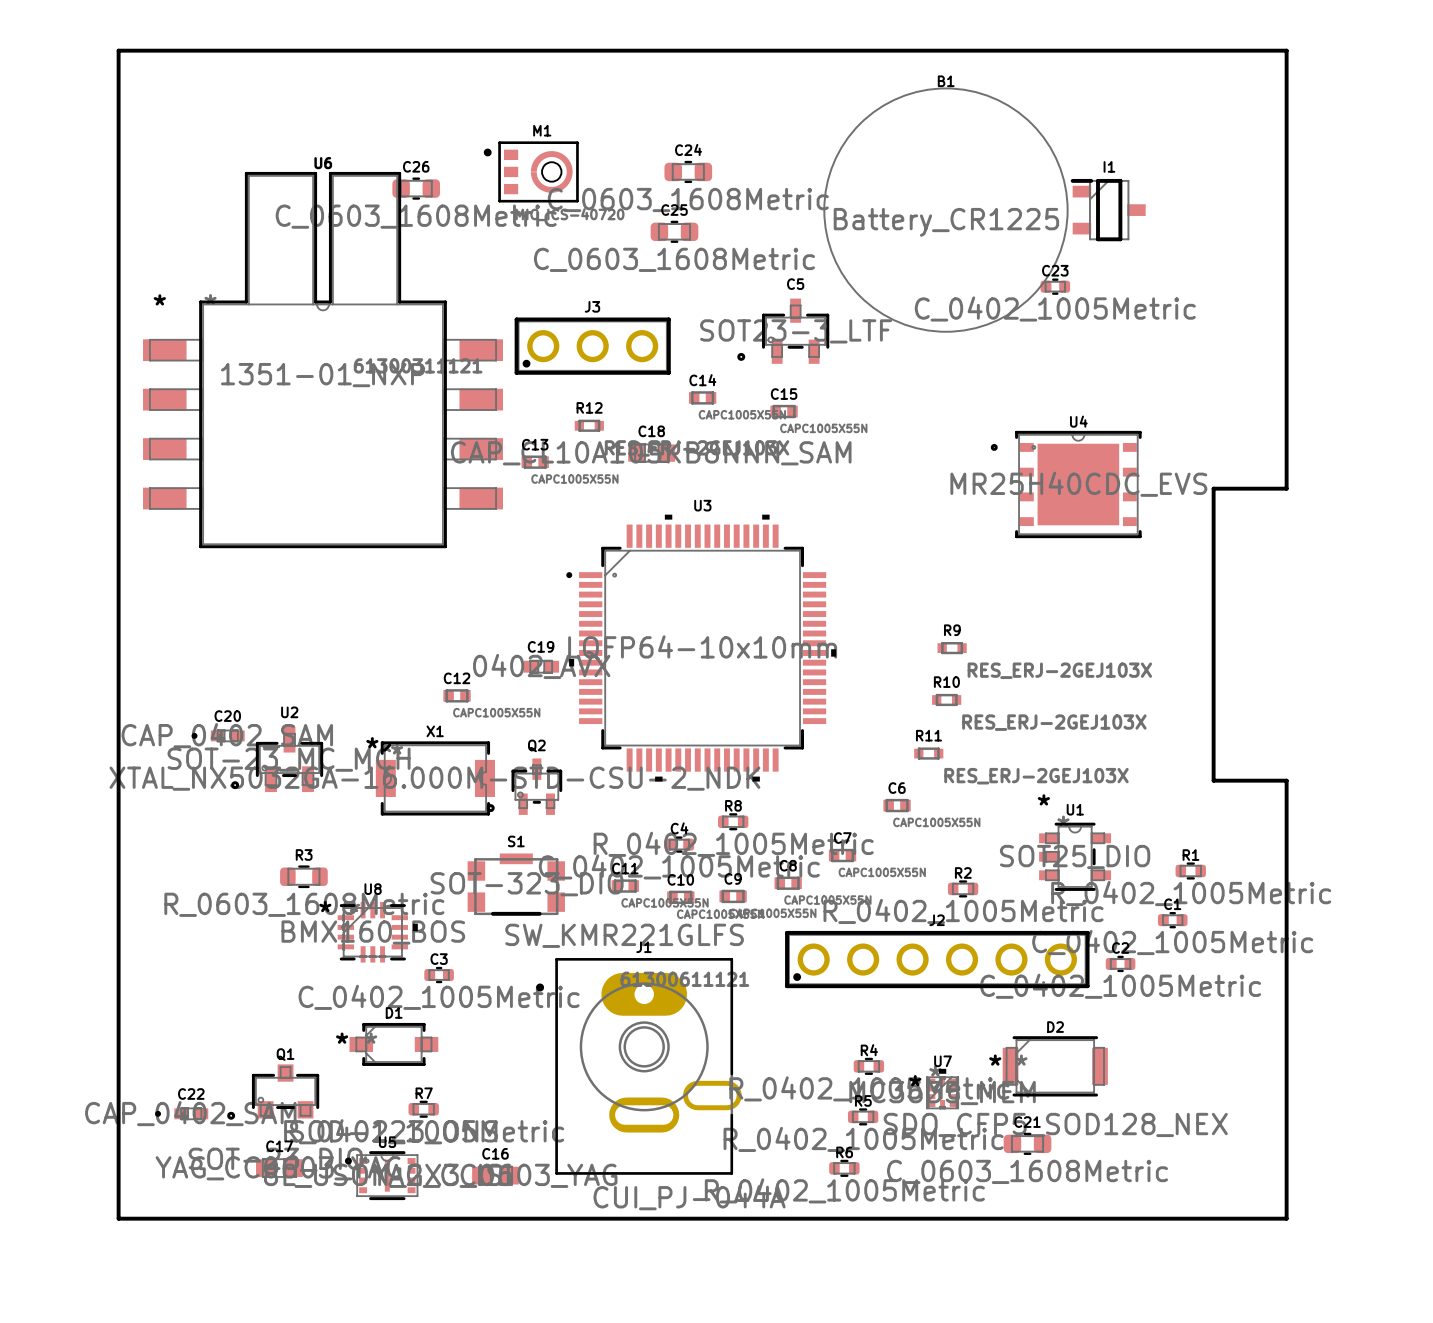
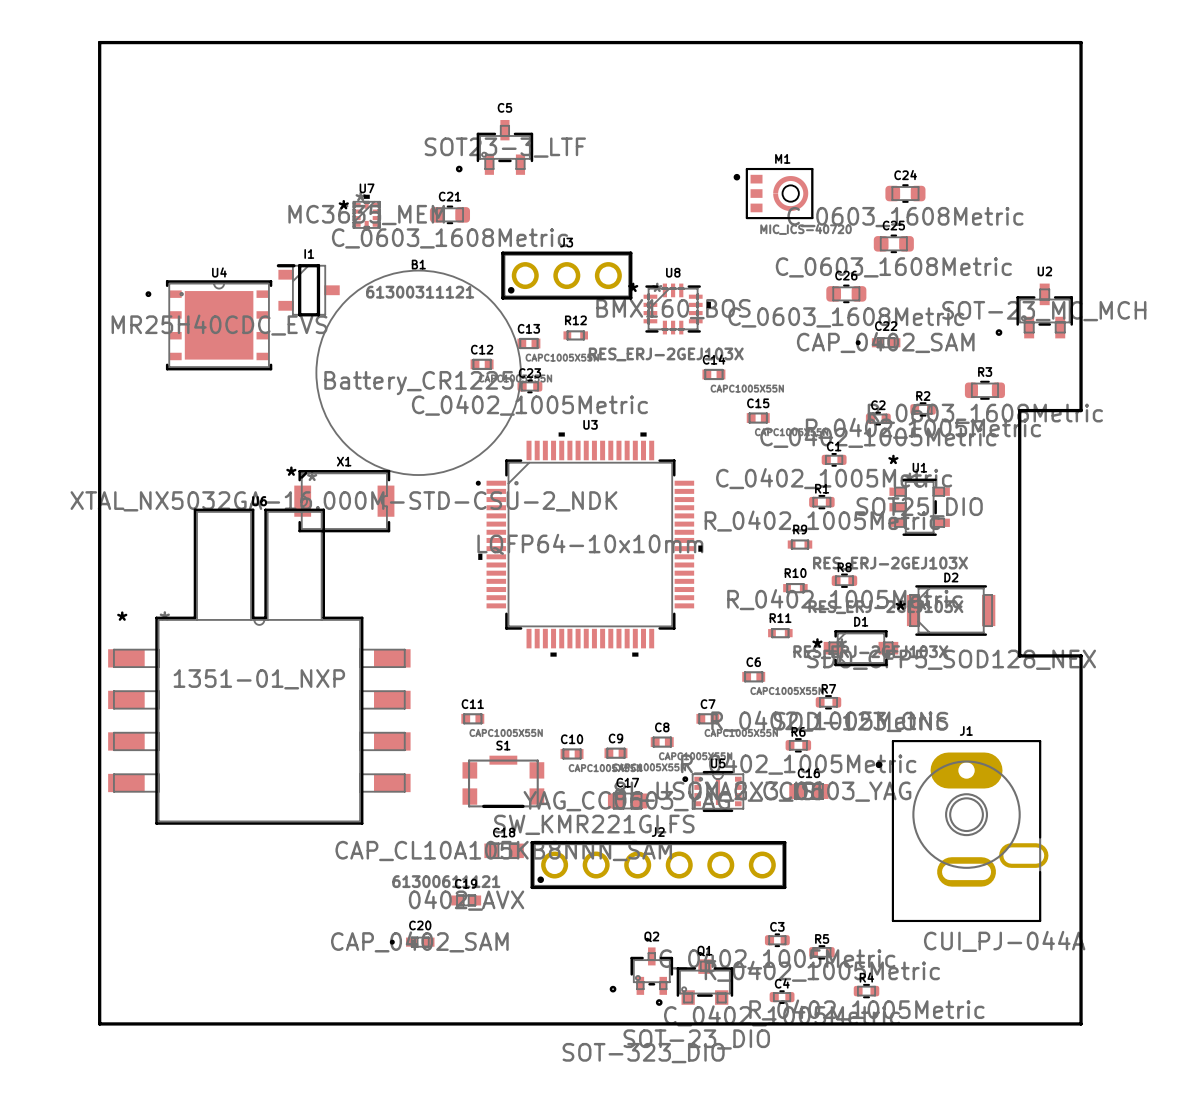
M1 position: (531, 171) -> (773, 193)
C24 position: (688, 171) -> (905, 193)
C26 position: (416, 188) -> (846, 293)
B1 position: (945, 210) -> (418, 372)
I1 position: (1108, 210) -> (308, 290)
C25 position: (674, 231) -> (893, 243)
C23 position: (1055, 286) -> (529, 386)
C5 position: (783, 331) -> (494, 147)
J3 position: (592, 346) -> (566, 275)
U6 position: (323, 360) -> (259, 666)
C14 position: (702, 397) -> (713, 374)
C15 position: (784, 411) -> (758, 418)
R12 position: (589, 425) -> (575, 335)
C18 position: (651, 453) -> (504, 850)
C13 position: (535, 462) -> (528, 343)
U4 position: (1066, 484) -> (208, 325)
C19 position: (541, 666) -> (466, 900)
C12 position: (457, 695) -> (482, 364)
C20 position: (218, 735) -> (412, 942)
U2 position: (277, 759) -> (1034, 310)
X1 position: (435, 778) -> (344, 501)
Q2 position: (524, 786) -> (641, 971)
R8 position: (733, 821) -> (844, 580)
C4 position: (679, 844) -> (782, 997)
U1 position: (1075, 856) -> (919, 507)
R1 position: (1190, 871) -> (821, 502)
R3 position: (303, 876) -> (984, 390)
S1 position: (516, 884) -> (503, 781)
C11 position: (625, 886) -> (472, 718)
R2 position: (963, 888) -> (923, 409)
C1 position: (1172, 920) -> (834, 459)
U8 position: (377, 932) -> (677, 308)
J2 position: (937, 959) -> (658, 865)
C2 position: (1120, 963) -> (878, 418)
C3 position: (439, 975) -> (777, 940)
D1 position: (393, 1044) -> (860, 648)
J1 position: (638, 1066) -> (962, 831)
R4 position: (868, 1066) -> (866, 991)
D2 position: (1055, 1066) -> (951, 610)
U7 position: (942, 1088) -> (366, 211)
Q1 position: (273, 1092) -> (694, 982)
R7 position: (423, 1109) -> (828, 702)
C22 position: (181, 1113) -> (878, 342)
R5 position: (863, 1116) -> (821, 952)
C21 position: (1027, 1143) -> (449, 214)
C17 position: (279, 1168) -> (627, 800)
R6 position: (844, 1168) -> (798, 745)
U5 position: (381, 1175) -> (712, 791)
C16 position: (495, 1175) -> (808, 791)

